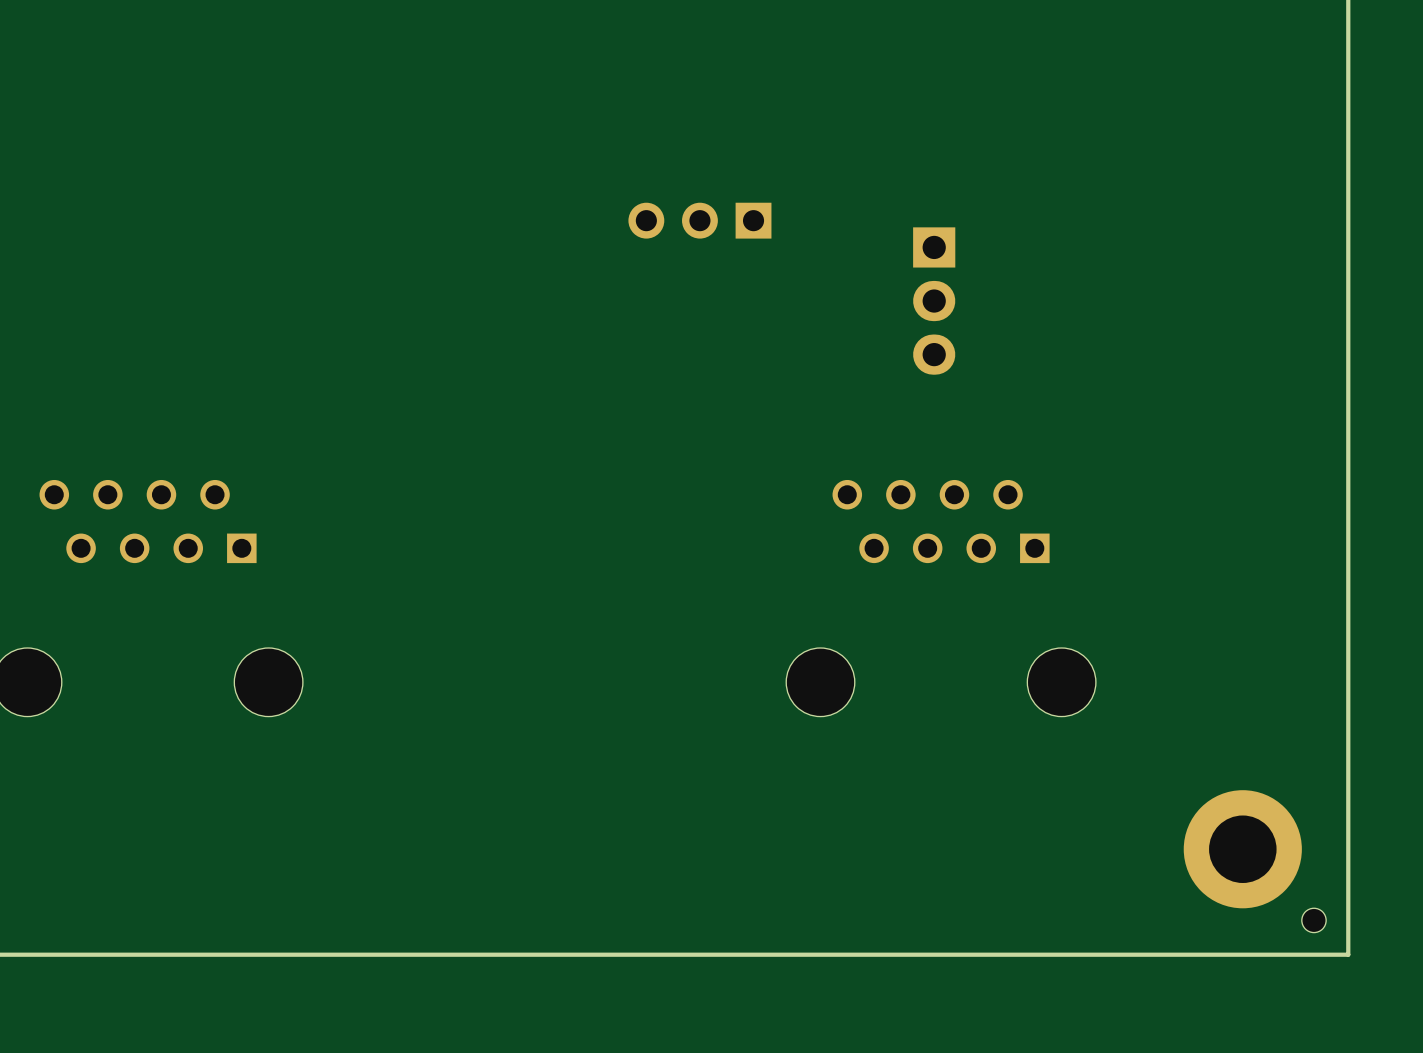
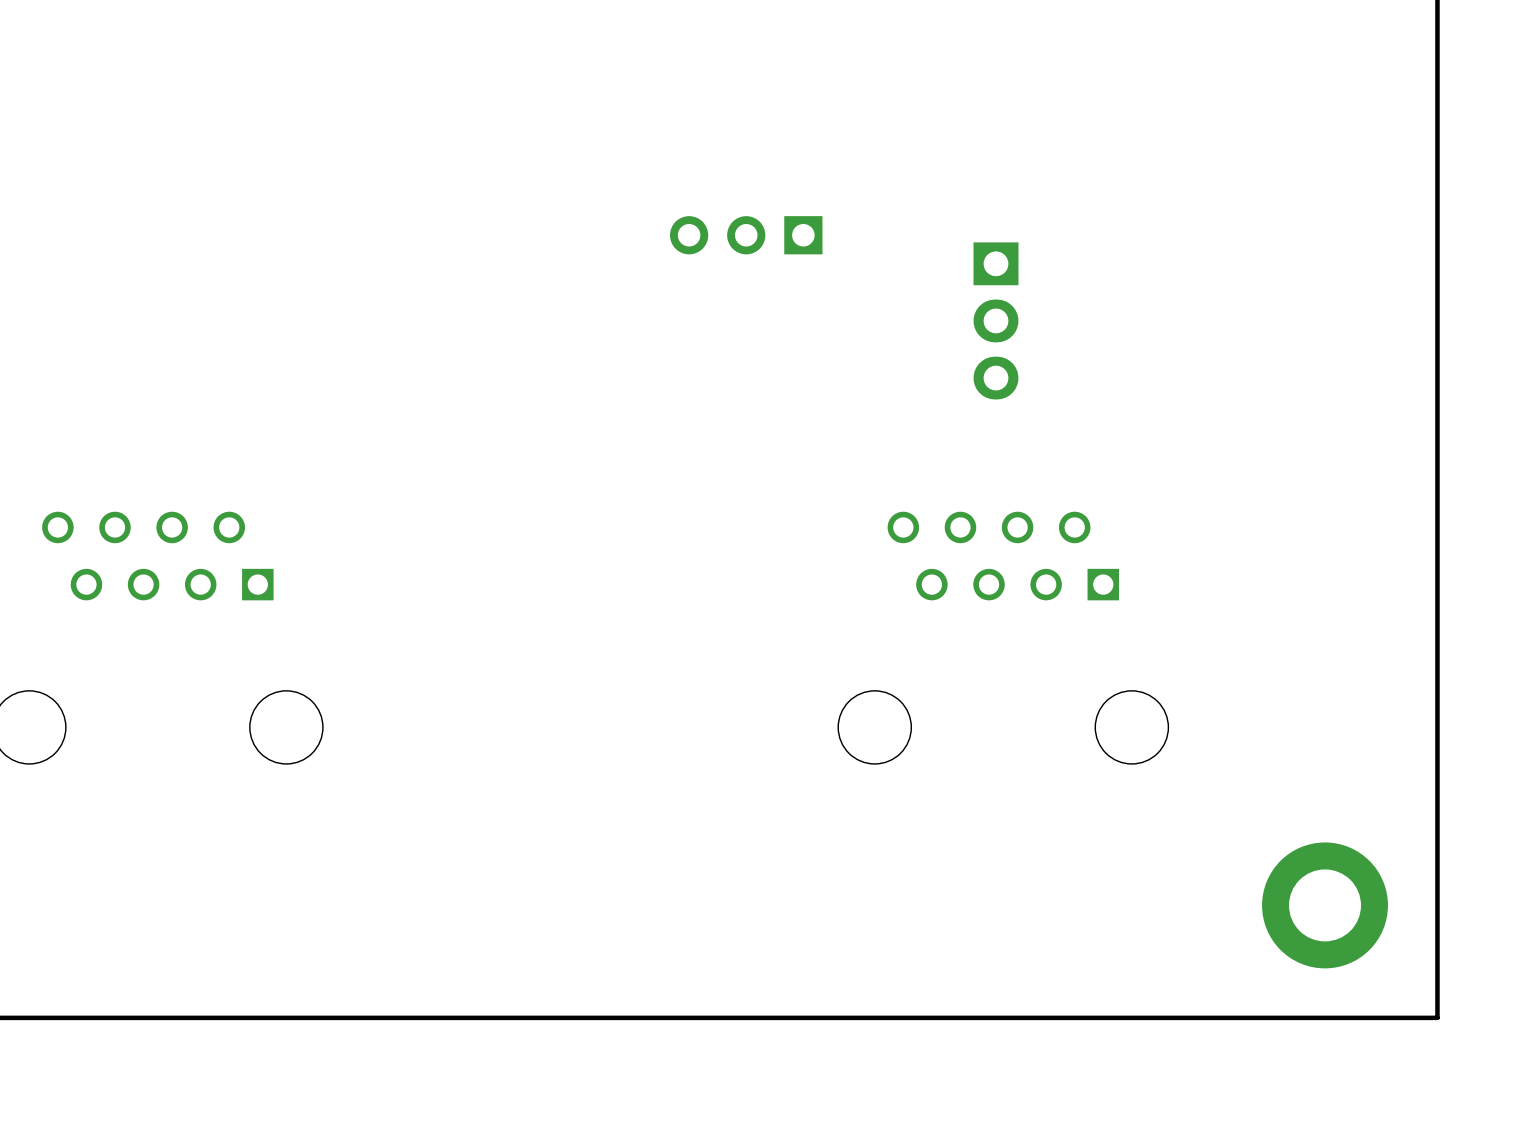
part: (1313, 920) -> none

